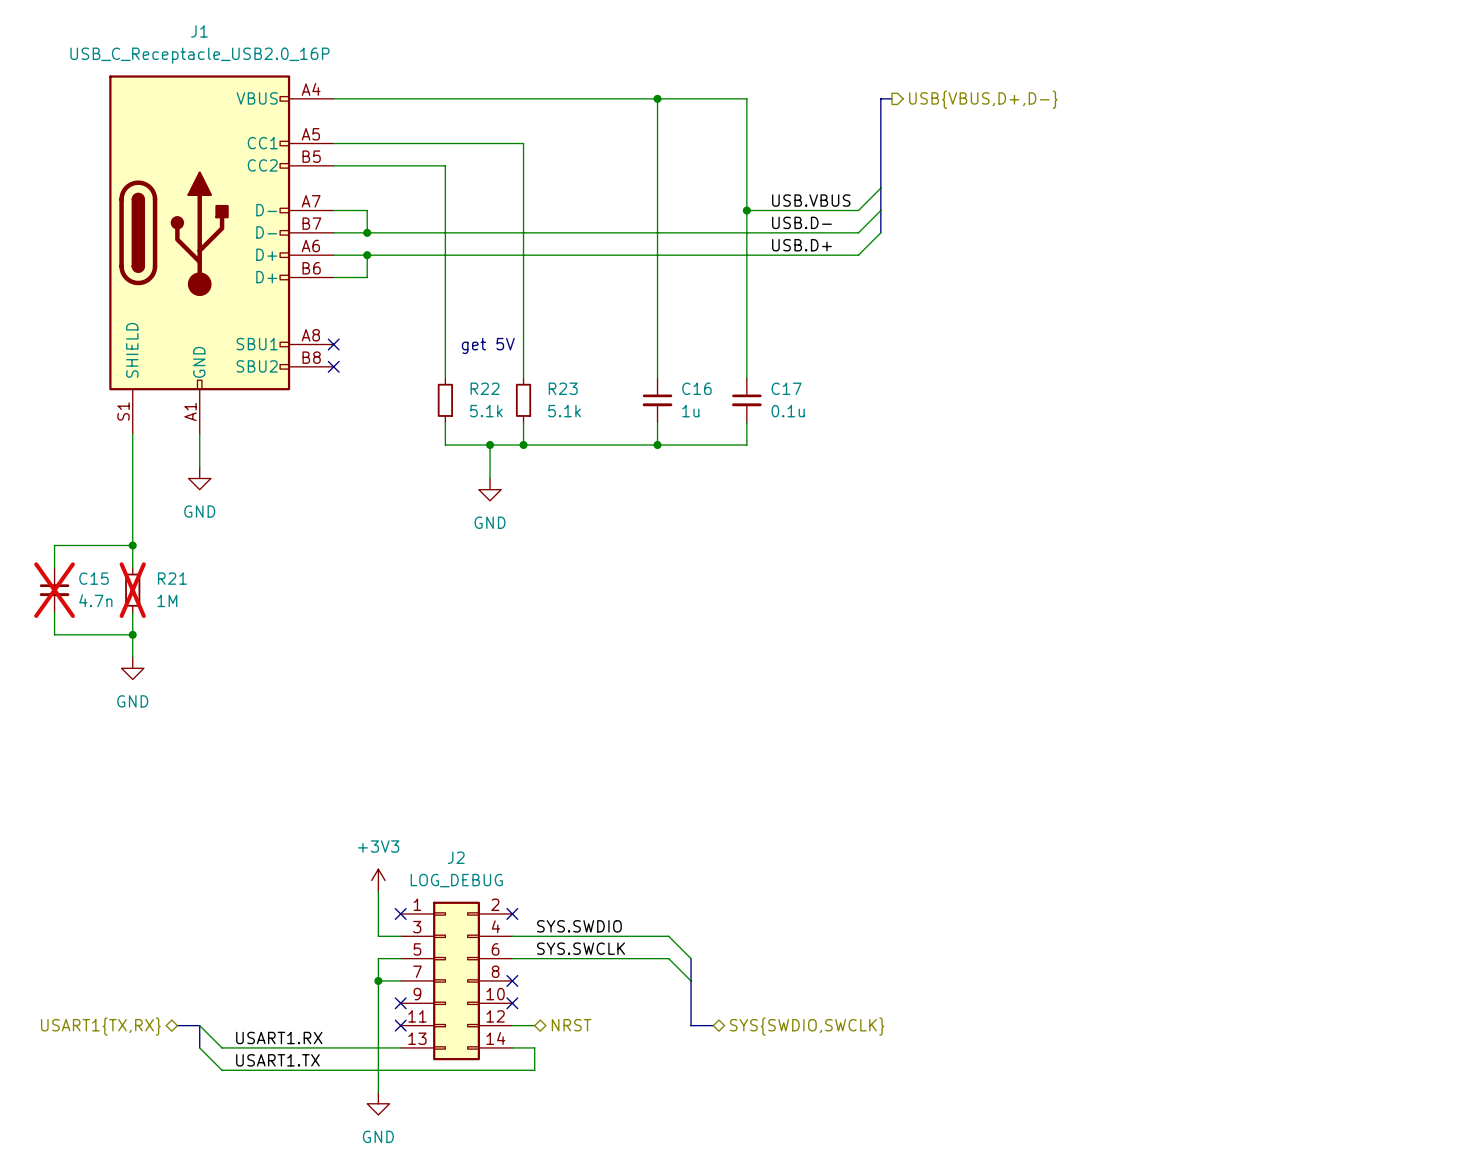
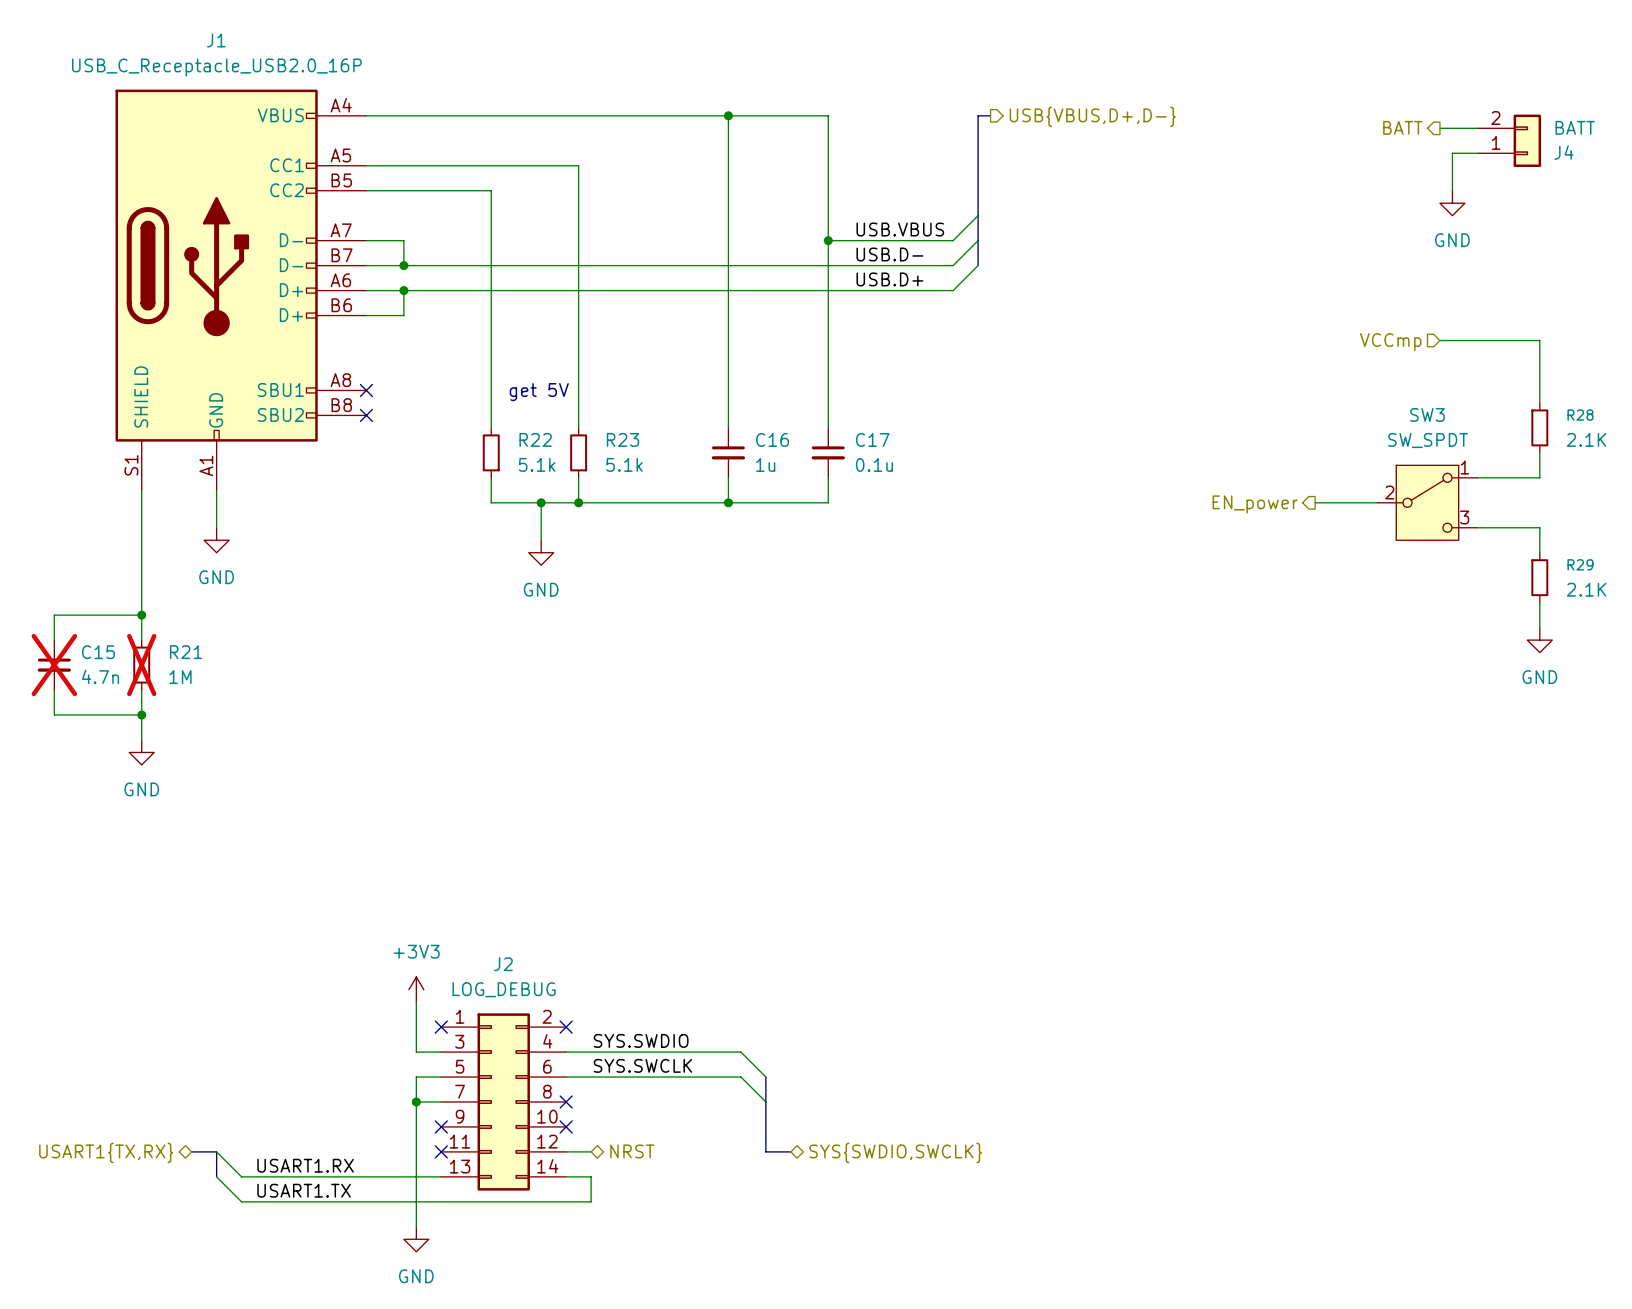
hierarchical label: none -> BATT (1402, 127)
wire: none -> (1439, 128) (1477, 128)
J4: none -> BATT (1509, 140)
wire: none -> (1477, 153) (1452, 153) (1452, 190)
power symbol: none -> GND (1452, 203)
wire: none -> (1439, 340) (1539, 340) (1539, 402)
hierarchical label: none -> VCCmp (1390, 342)
R28: none -> 2.1K (1539, 427)
wire: none -> (1539, 452) (1539, 477) (1477, 477)
wire: none -> (1315, 502) (1377, 502)
SW3: none -> SW_SPDT (1427, 502)
hierarchical label: none -> EN_power (1255, 504)
wire: none -> (1477, 527) (1539, 527) (1539, 552)
R29: none -> 2.1K (1539, 577)
wire: none -> (1539, 602) (1539, 627)
power symbol: none -> GND (1539, 640)

